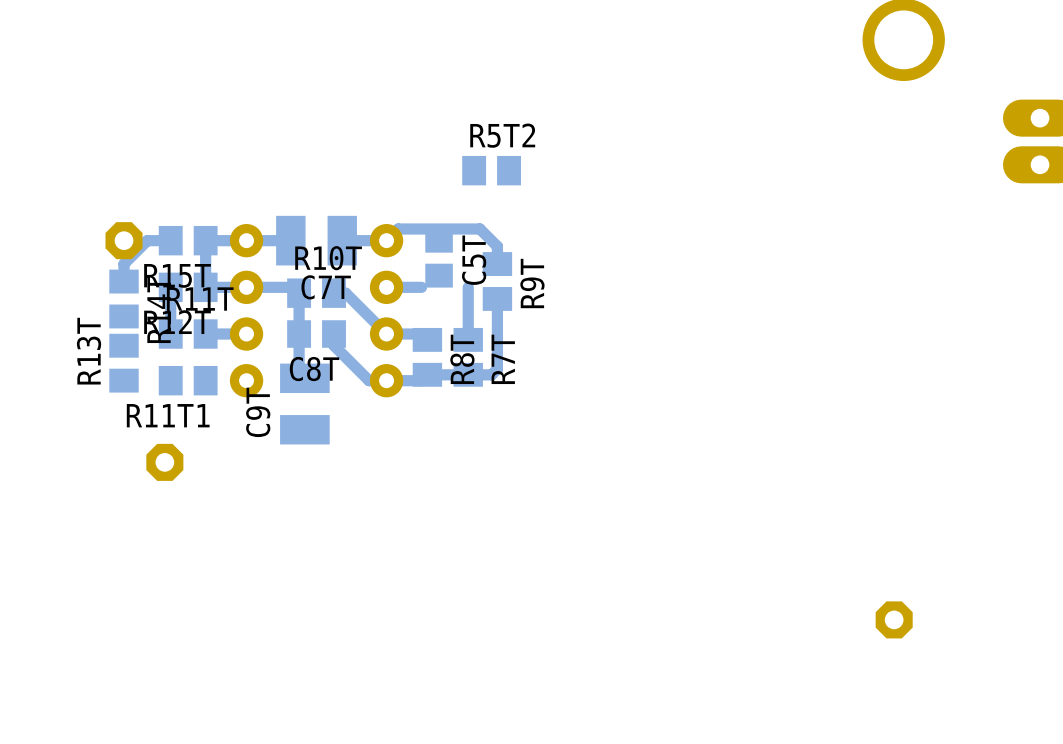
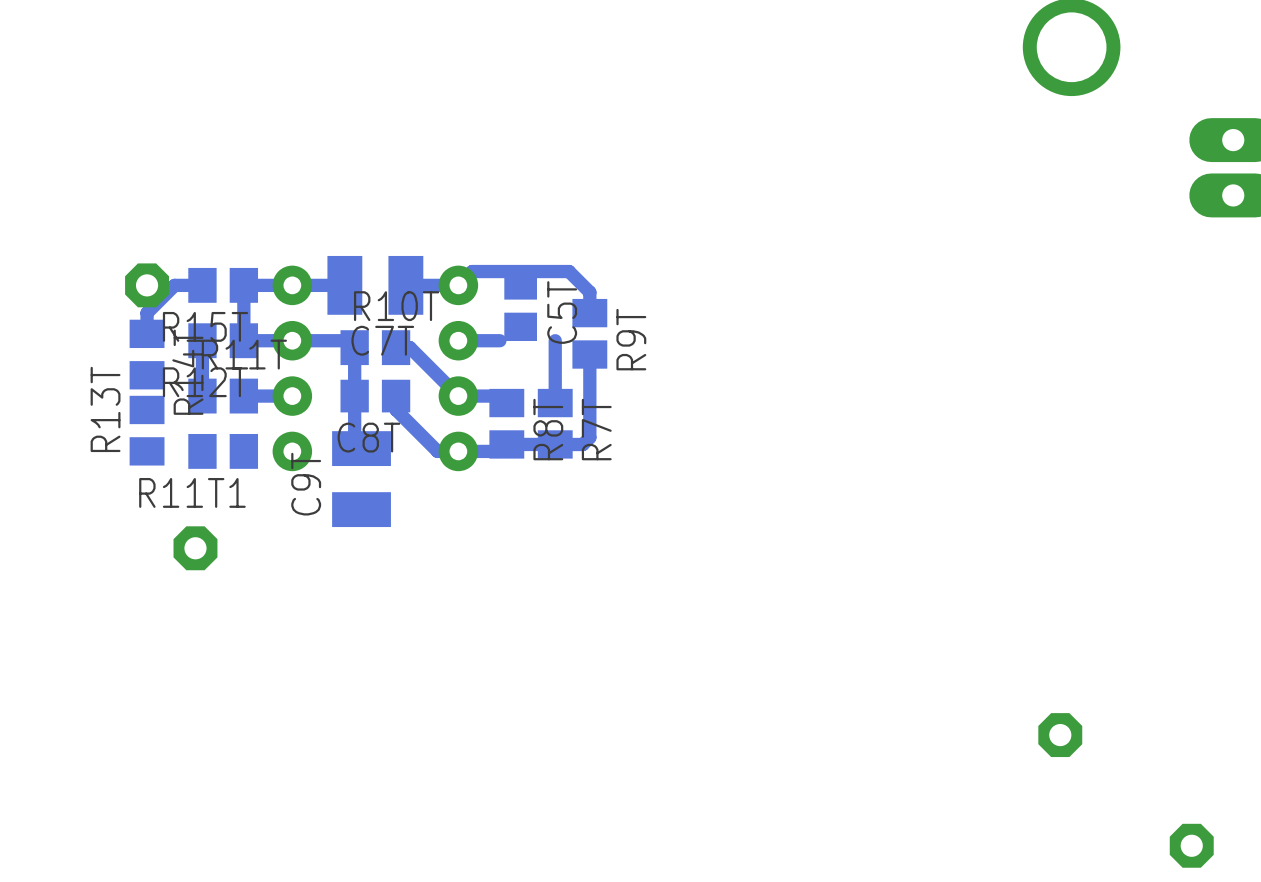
R5T2: (491, 170) -> none
part: none -> (1191, 845)

